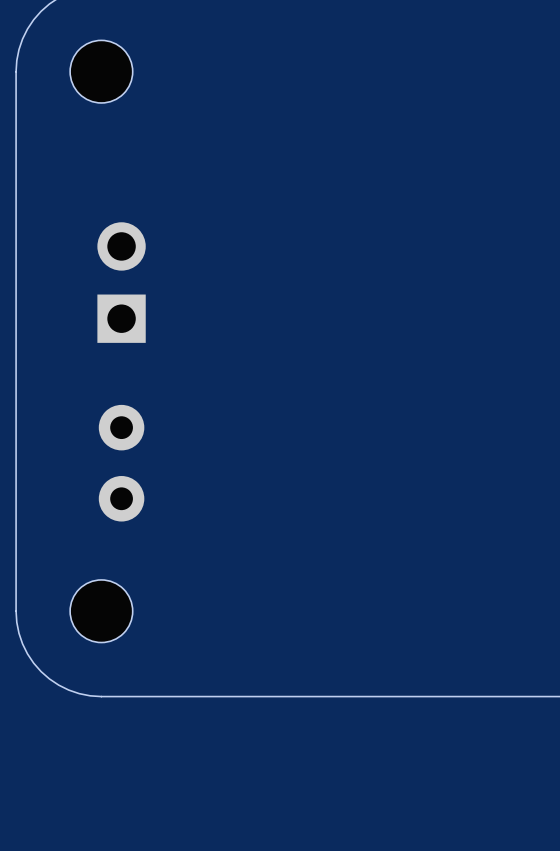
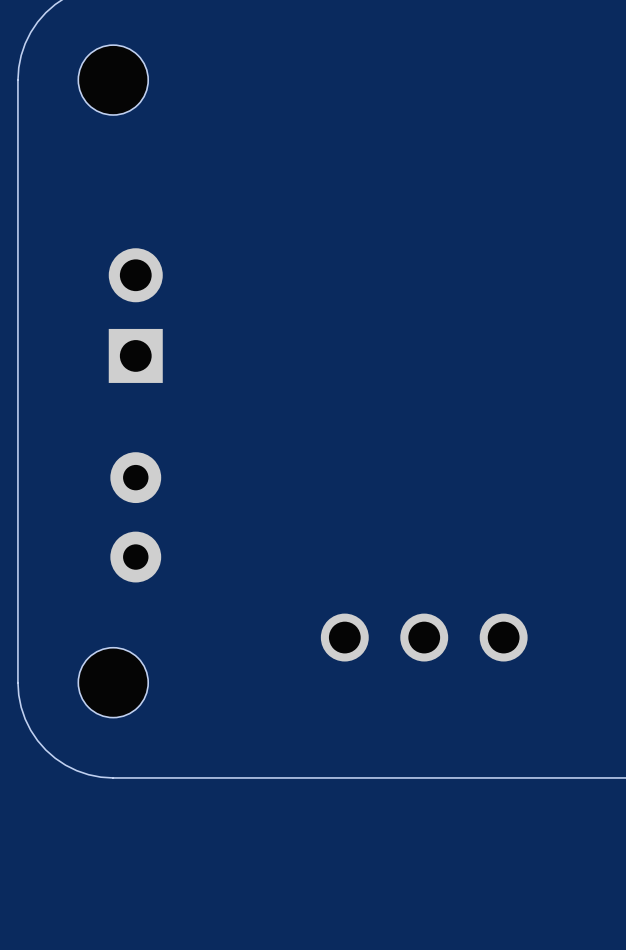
part: none -> (424, 637)

